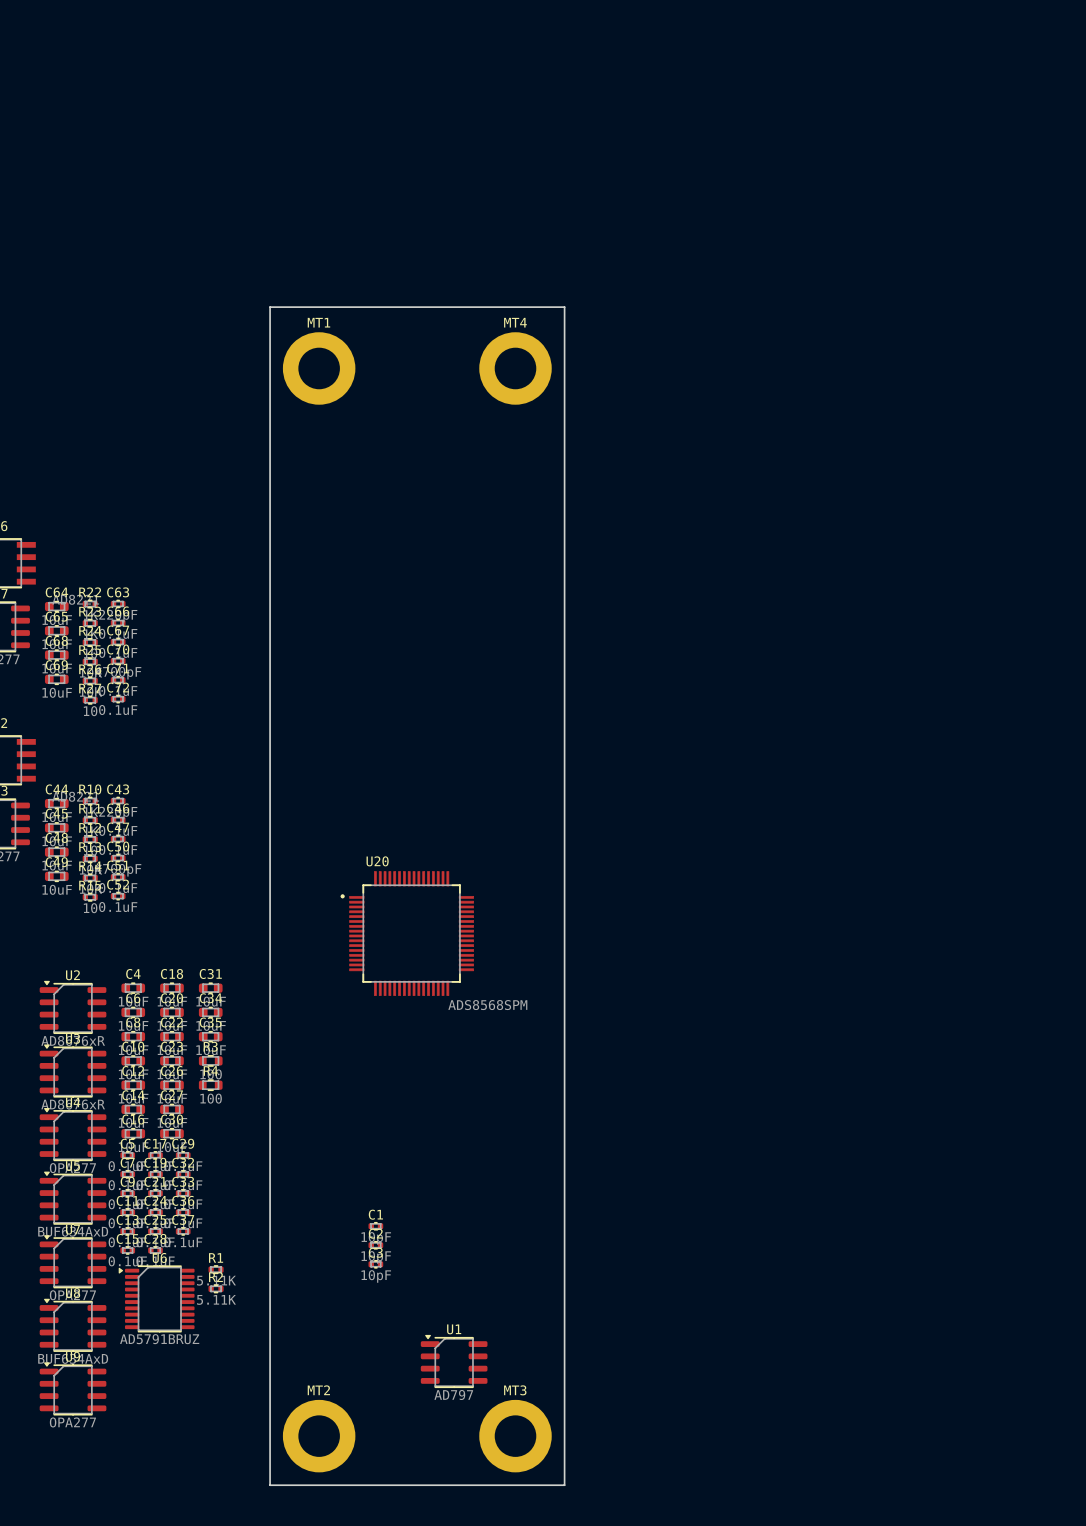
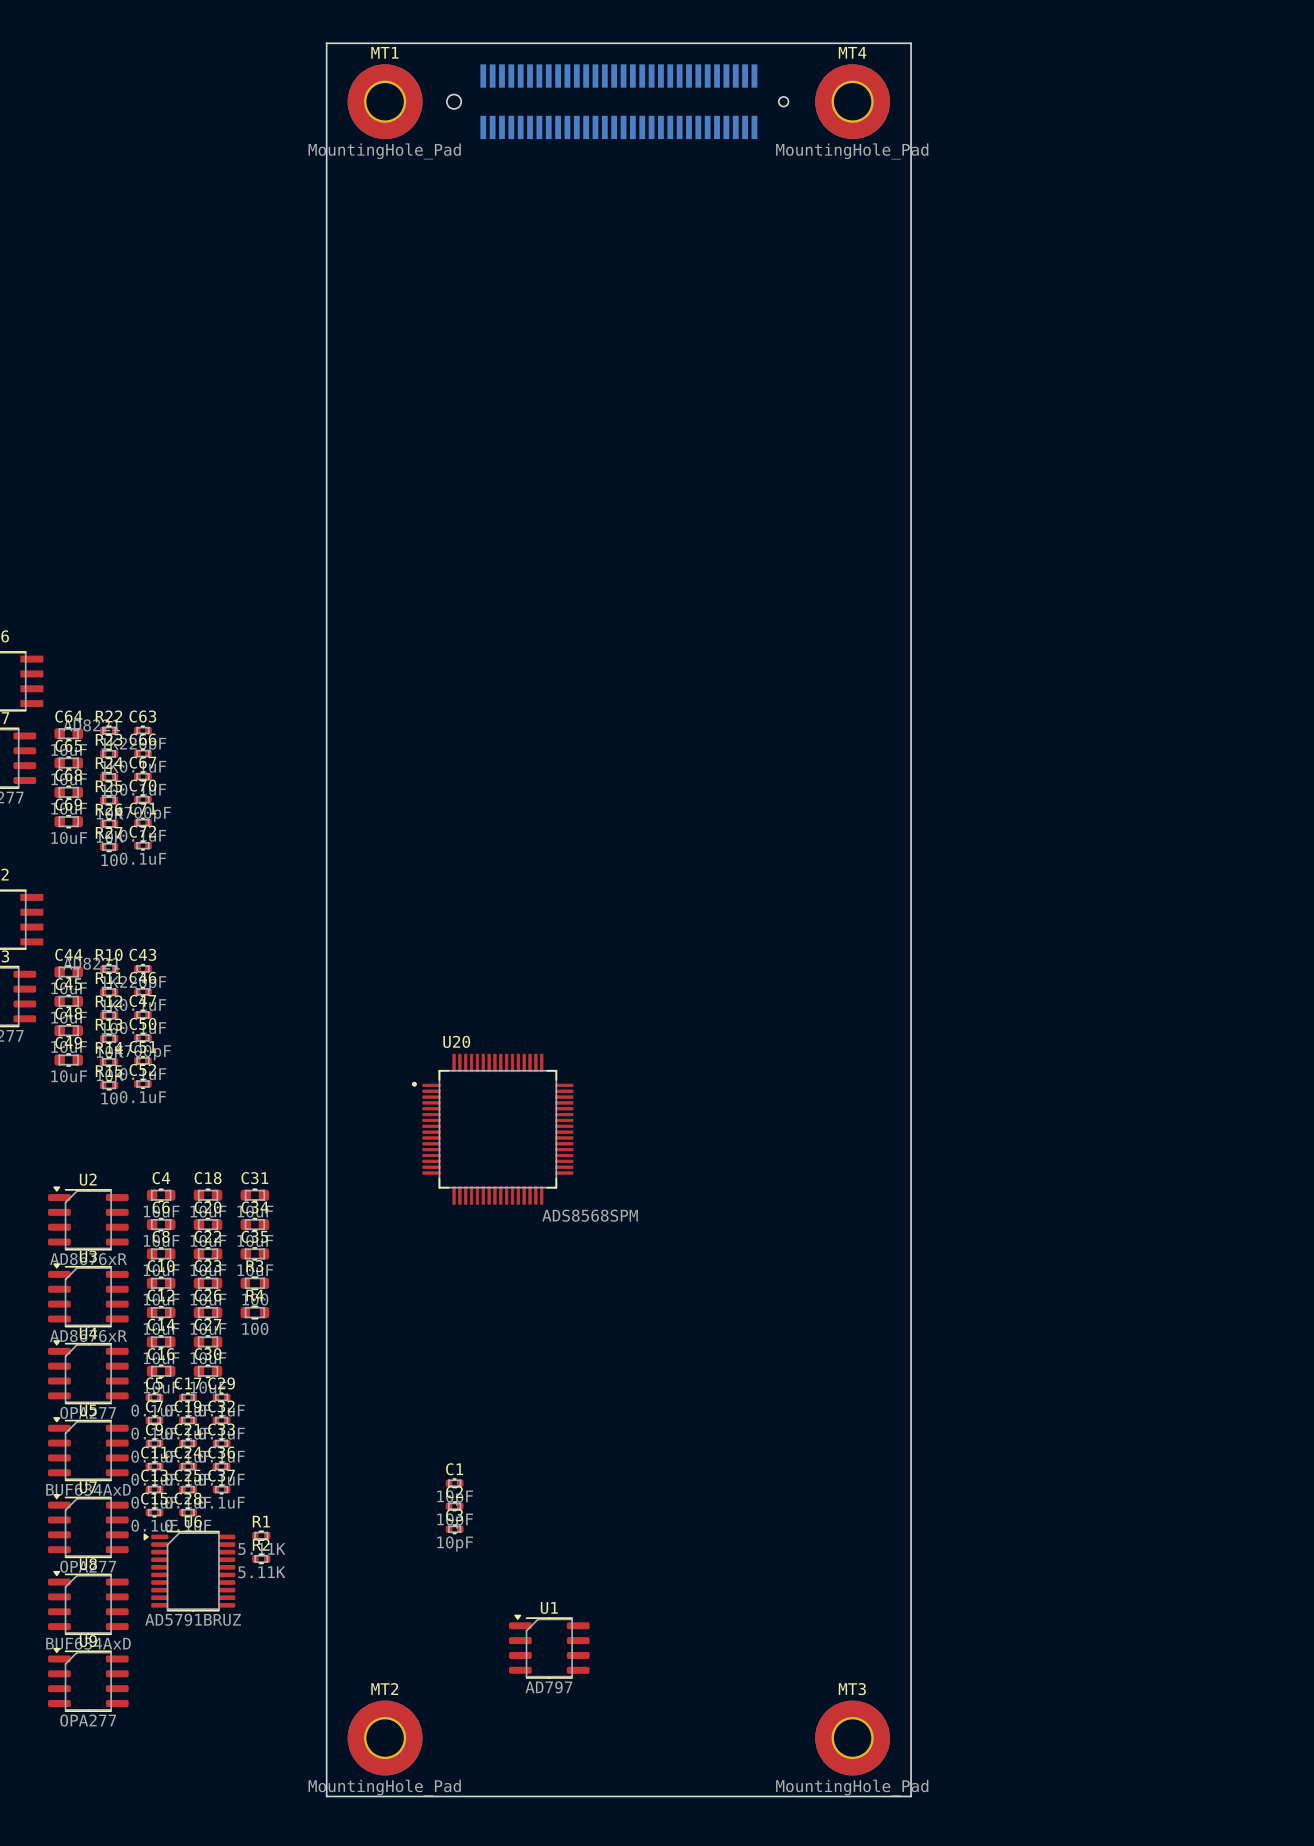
part: none -> (617, 101)
MT1 value: none -> MountingHole_Pad (384, 151)
MT4 value: none -> MountingHole_Pad (852, 151)
board edge: (270, 307) (564, 307) (564, 1485) -> (326, 371) (326, 43) (911, 43) (911, 1796) (682, 1796)
MT1 footprint: [282, 332, 356, 405] -> [347, 64, 423, 140]
MT4 footprint: [479, 332, 552, 405] -> [815, 64, 891, 140]
MT2 footprint: [282, 1399, 356, 1473] -> [347, 1700, 423, 1776]
MT3 footprint: [479, 1399, 552, 1473] -> [815, 1700, 891, 1776]
MT2 value: none -> MountingHole_Pad (384, 1787)
MT3 value: none -> MountingHole_Pad (852, 1787)

